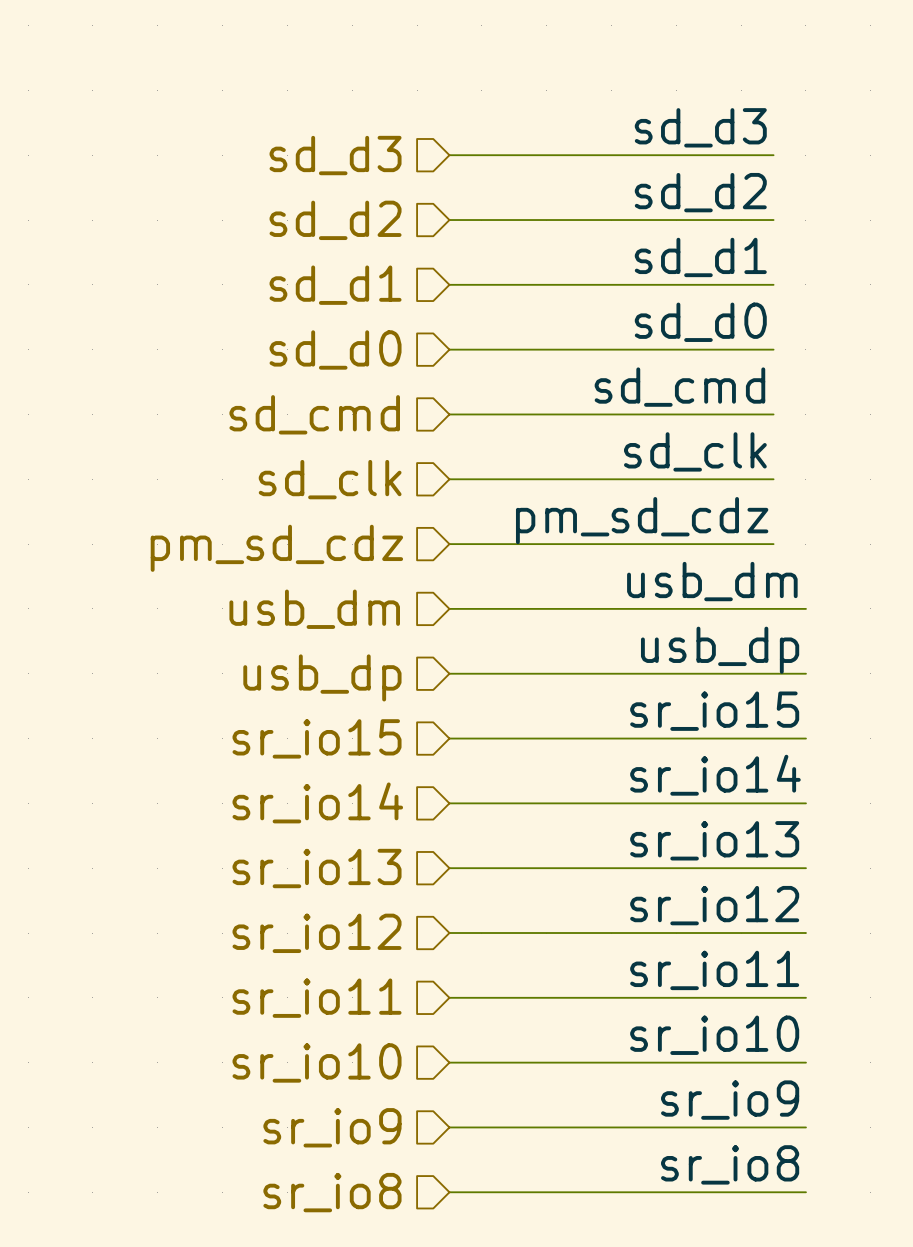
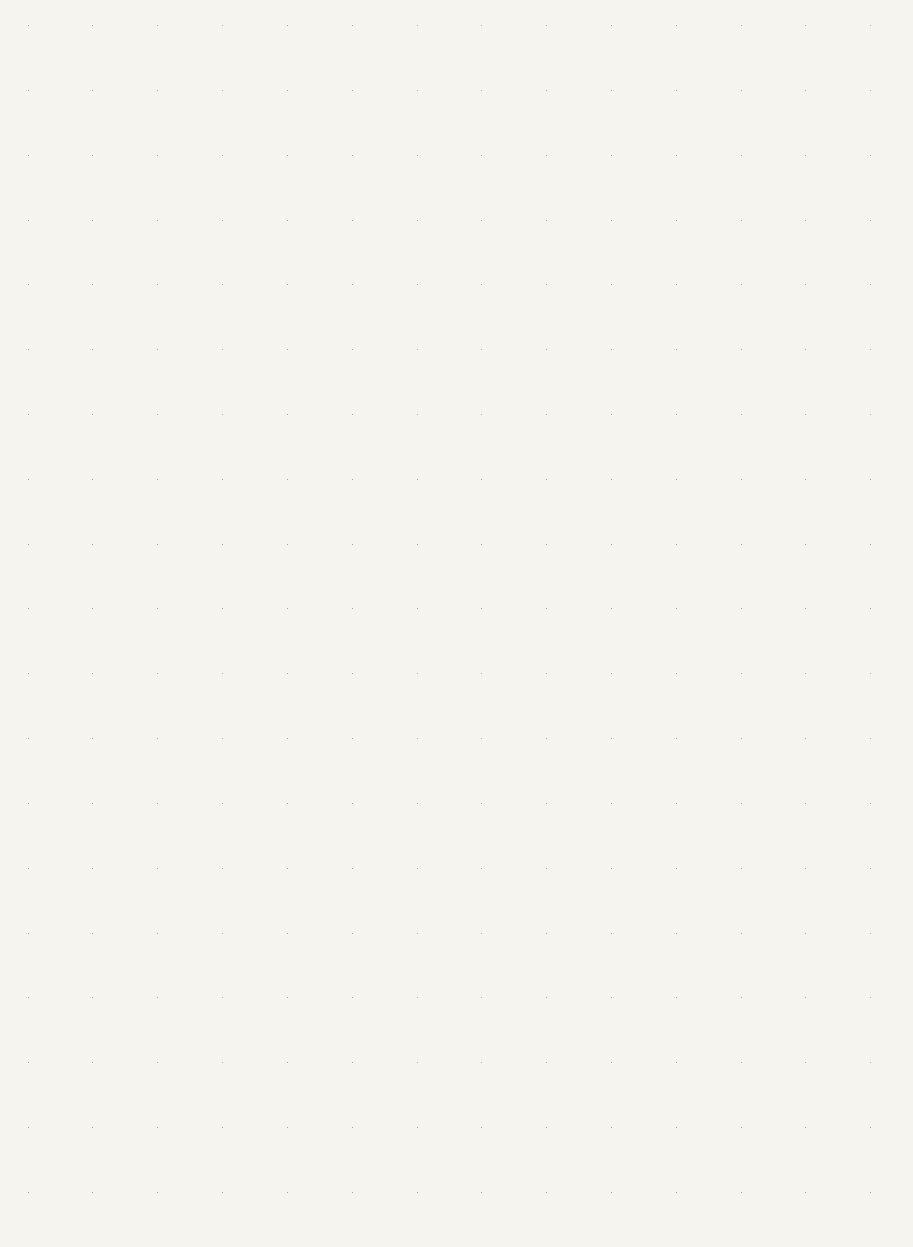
label: sd_d3 (700, 127) -> none
hierarchical label: sd_d3 (335, 155) -> none
wire: (449, 155) (773, 155) -> none
label: sd_d2 (700, 192) -> none
hierarchical label: sd_d2 (335, 220) -> none
wire: (449, 220) (773, 220) -> none
label: sd_d1 (700, 257) -> none
wire: (449, 284) (773, 284) -> none
hierarchical label: sd_d1 (335, 285) -> none
label: sd_d0 (700, 322) -> none
hierarchical label: sd_d0 (335, 349) -> none
wire: (449, 349) (773, 349) -> none
label: sd_cmd (679, 387) -> none
hierarchical label: sd_cmd (314, 414) -> none
wire: (449, 414) (773, 414) -> none
label: sd_clk (695, 451) -> none
hierarchical label: sd_clk (330, 479) -> none
wire: (449, 479) (773, 479) -> none
label: pm_sd_cdz (642, 520) -> none
wire: (449, 544) (773, 544) -> none
hierarchical label: pm_sd_cdz (276, 548) -> none
label: usb_dm (712, 581) -> none
wire: (449, 608) (805, 608) -> none
hierarchical label: usb_dm (314, 609) -> none
label: usb_dp (720, 650) -> none
wire: (449, 673) (805, 673) -> none
hierarchical label: usb_dp (322, 677) -> none
label: sr_io15 (714, 711) -> none
hierarchical label: sr_io15 (317, 738) -> none
wire: (449, 738) (805, 738) -> none
label: sr_io14 (715, 775) -> none
hierarchical label: sr_io14 (317, 802) -> none
wire: (449, 803) (805, 803) -> none
label: sr_io13 (714, 840) -> none
hierarchical label: sr_io13 (317, 868) -> none
wire: (449, 868) (805, 868) -> none
label: sr_io12 (714, 905) -> none
hierarchical label: sr_io12 (317, 933) -> none
wire: (449, 933) (805, 933) -> none
label: sr_io11 (714, 970) -> none
wire: (449, 997) (805, 997) -> none
hierarchical label: sr_io11 (317, 998) -> none
label: sr_io10 (714, 1035) -> none
hierarchical label: sr_io10 (317, 1062) -> none
wire: (449, 1062) (805, 1062) -> none
label: sr_io9 (730, 1100) -> none
hierarchical label: sr_io9 (332, 1127) -> none
wire: (449, 1127) (805, 1127) -> none
label: sr_io8 (730, 1164) -> none
hierarchical label: sr_io8 (332, 1192) -> none
wire: (449, 1192) (805, 1192) -> none

